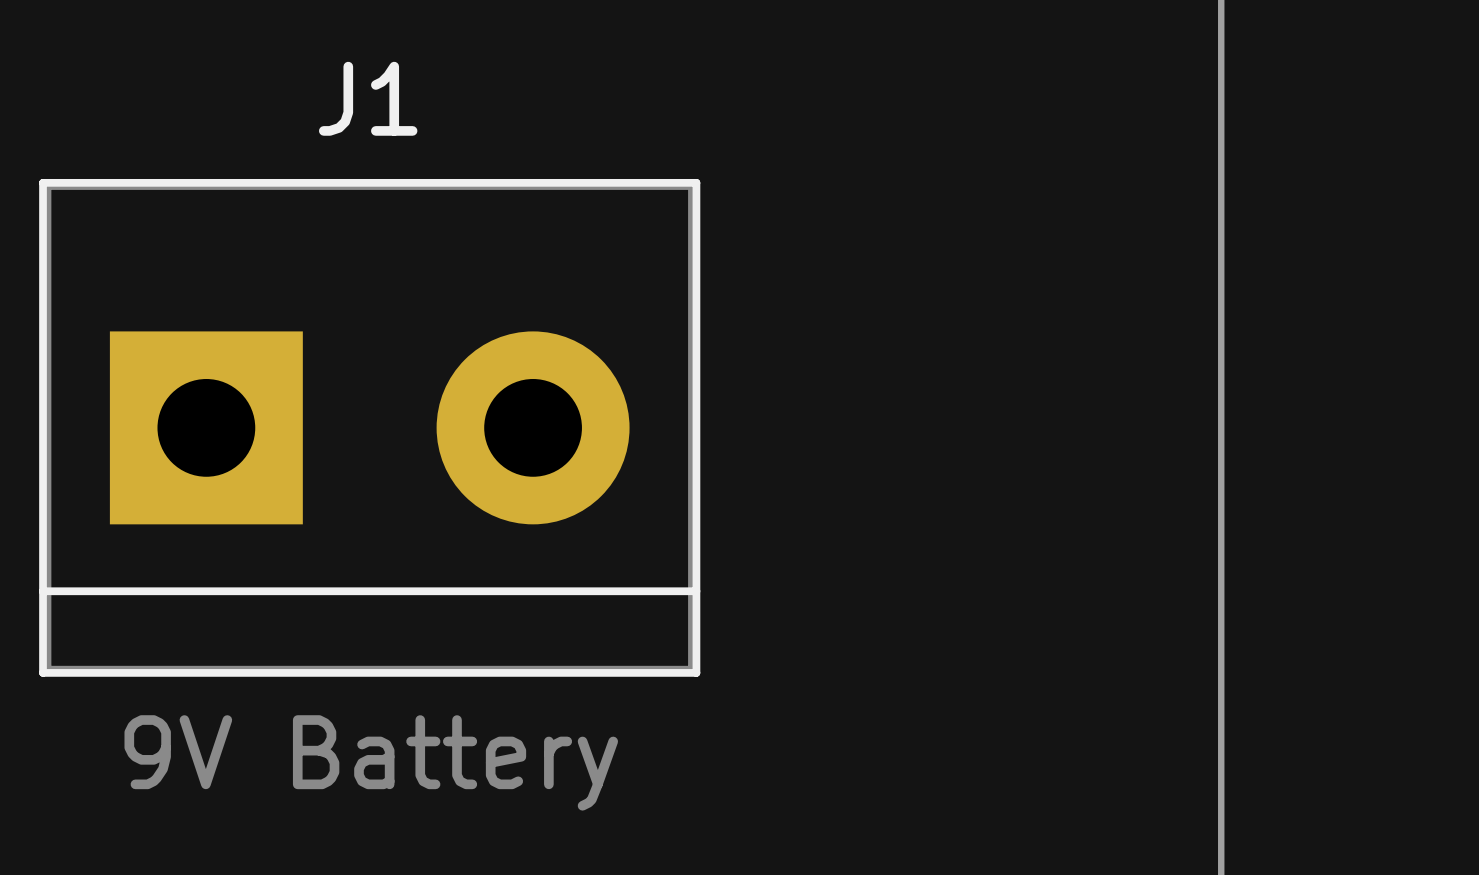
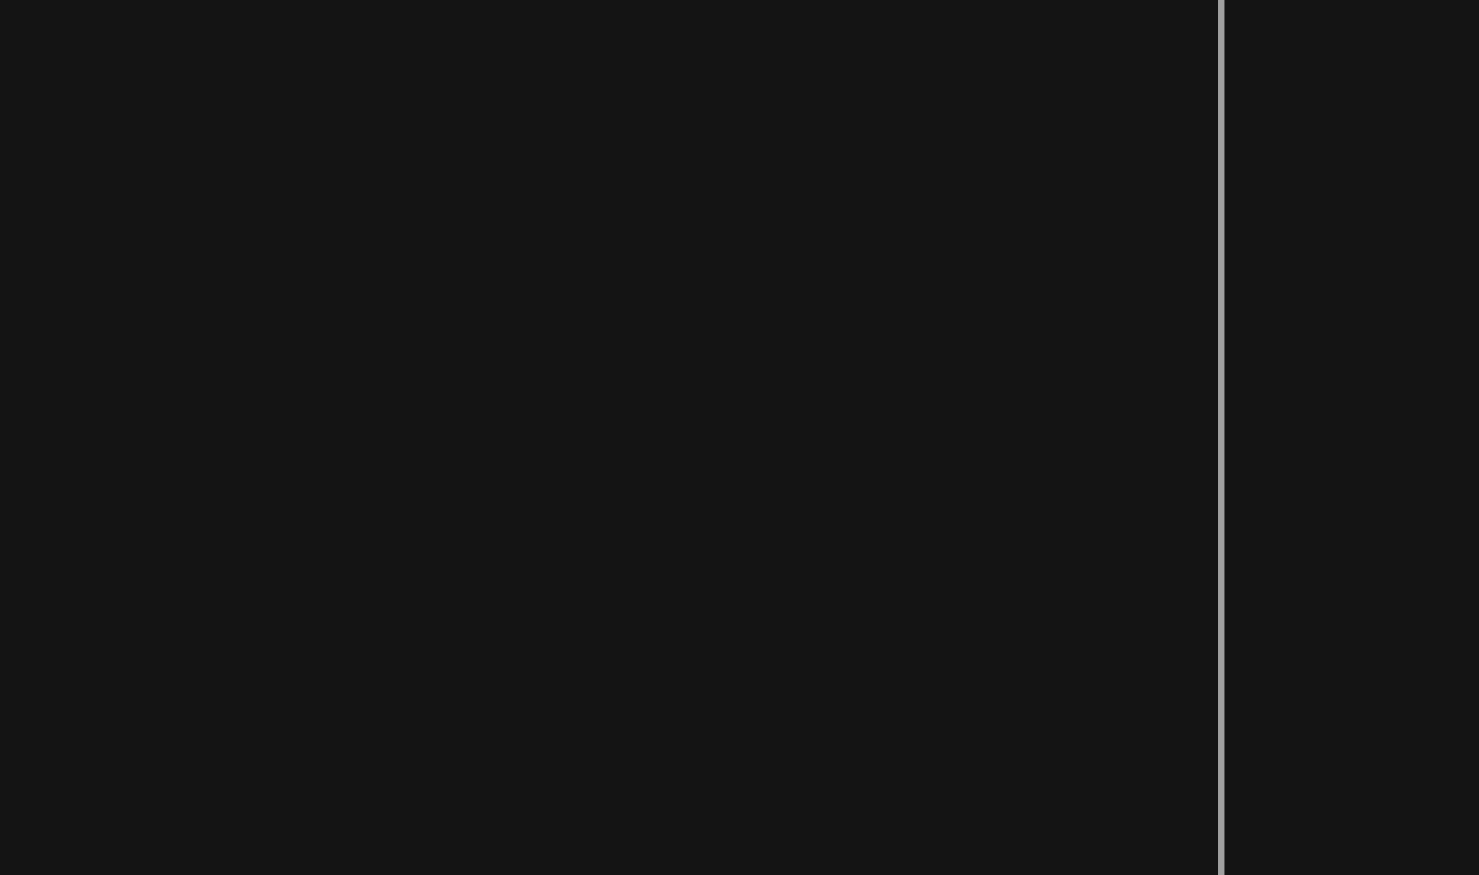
J1: 9V Battery (369, 427) -> none

